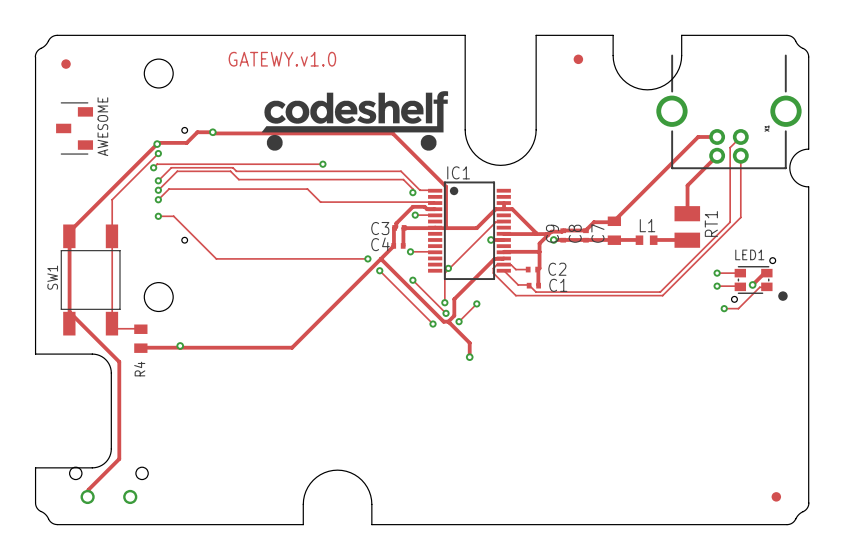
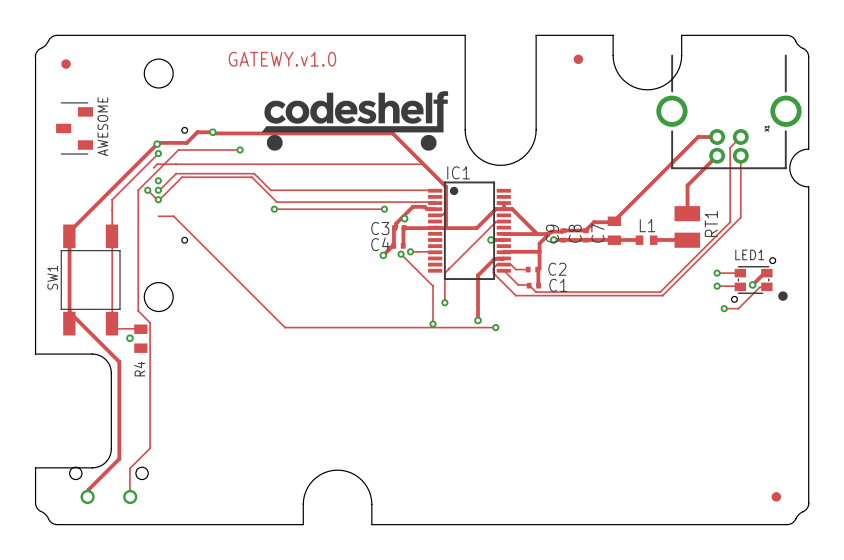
track: none -> (240, 150) (178, 150) (138, 190) (138, 311) (150, 322) (150, 448) (129, 468) (130, 496)
via: none -> (240, 150)
via: (322, 164) -> none
via: (153, 167) -> none
track: (158, 180) (171, 167) (232, 167) (236, 171) (401, 171) (419, 190) -> (158, 191) (176, 173) (254, 173) (270, 190) (419, 190)
via: none -> (147, 190)
track: (158, 190) (177, 171) (230, 171) (238, 179) (403, 179) (412, 189) (412, 192) -> none
via: (412, 192) -> none
track: (158, 199) (169, 189) (307, 189) (320, 202) -> (147, 190) (156, 198) (160, 198) (182, 177) (251, 177) (276, 202) (320, 202)
track: none -> (274, 209) (384, 209)
via: none -> (274, 209)
via: none -> (384, 209)
track: (415, 215) (435, 215) -> (322, 164) (422, 164) (444, 186) (444, 212) (442, 215) (435, 215)
via: (415, 215) -> none
via: (158, 216) -> none
via: none -> (404, 218)
track: (393, 245) (292, 347) (140, 348) -> (393, 245) (383, 255)
track: none -> (401, 254) (433, 286) (433, 320)
via: none -> (401, 254)
via: none -> (383, 255)
track: (216, 258) (367, 258) -> (216, 258) (285, 327) (495, 327)
via: (367, 258) -> none
track: (380, 258) (443, 321) (448, 321) -> none
via: (448, 268) -> none
track: (379, 270) (433, 324) -> none
via: (379, 270) -> none
track: (478, 275) (454, 299) (454, 315) (448, 321) -> (478, 275) (478, 320)
track: (412, 280) (446, 313) -> none
via: (412, 280) -> none
track: (476, 303) (459, 321) -> none
via: (476, 303) -> none
via: (446, 313) -> none
track: (448, 321) (469, 342) (469, 357) -> none
via: (459, 321) -> none
via: none -> (495, 327)
via position: (180, 345) -> (129, 338)
via position: (469, 357) -> (478, 320)

